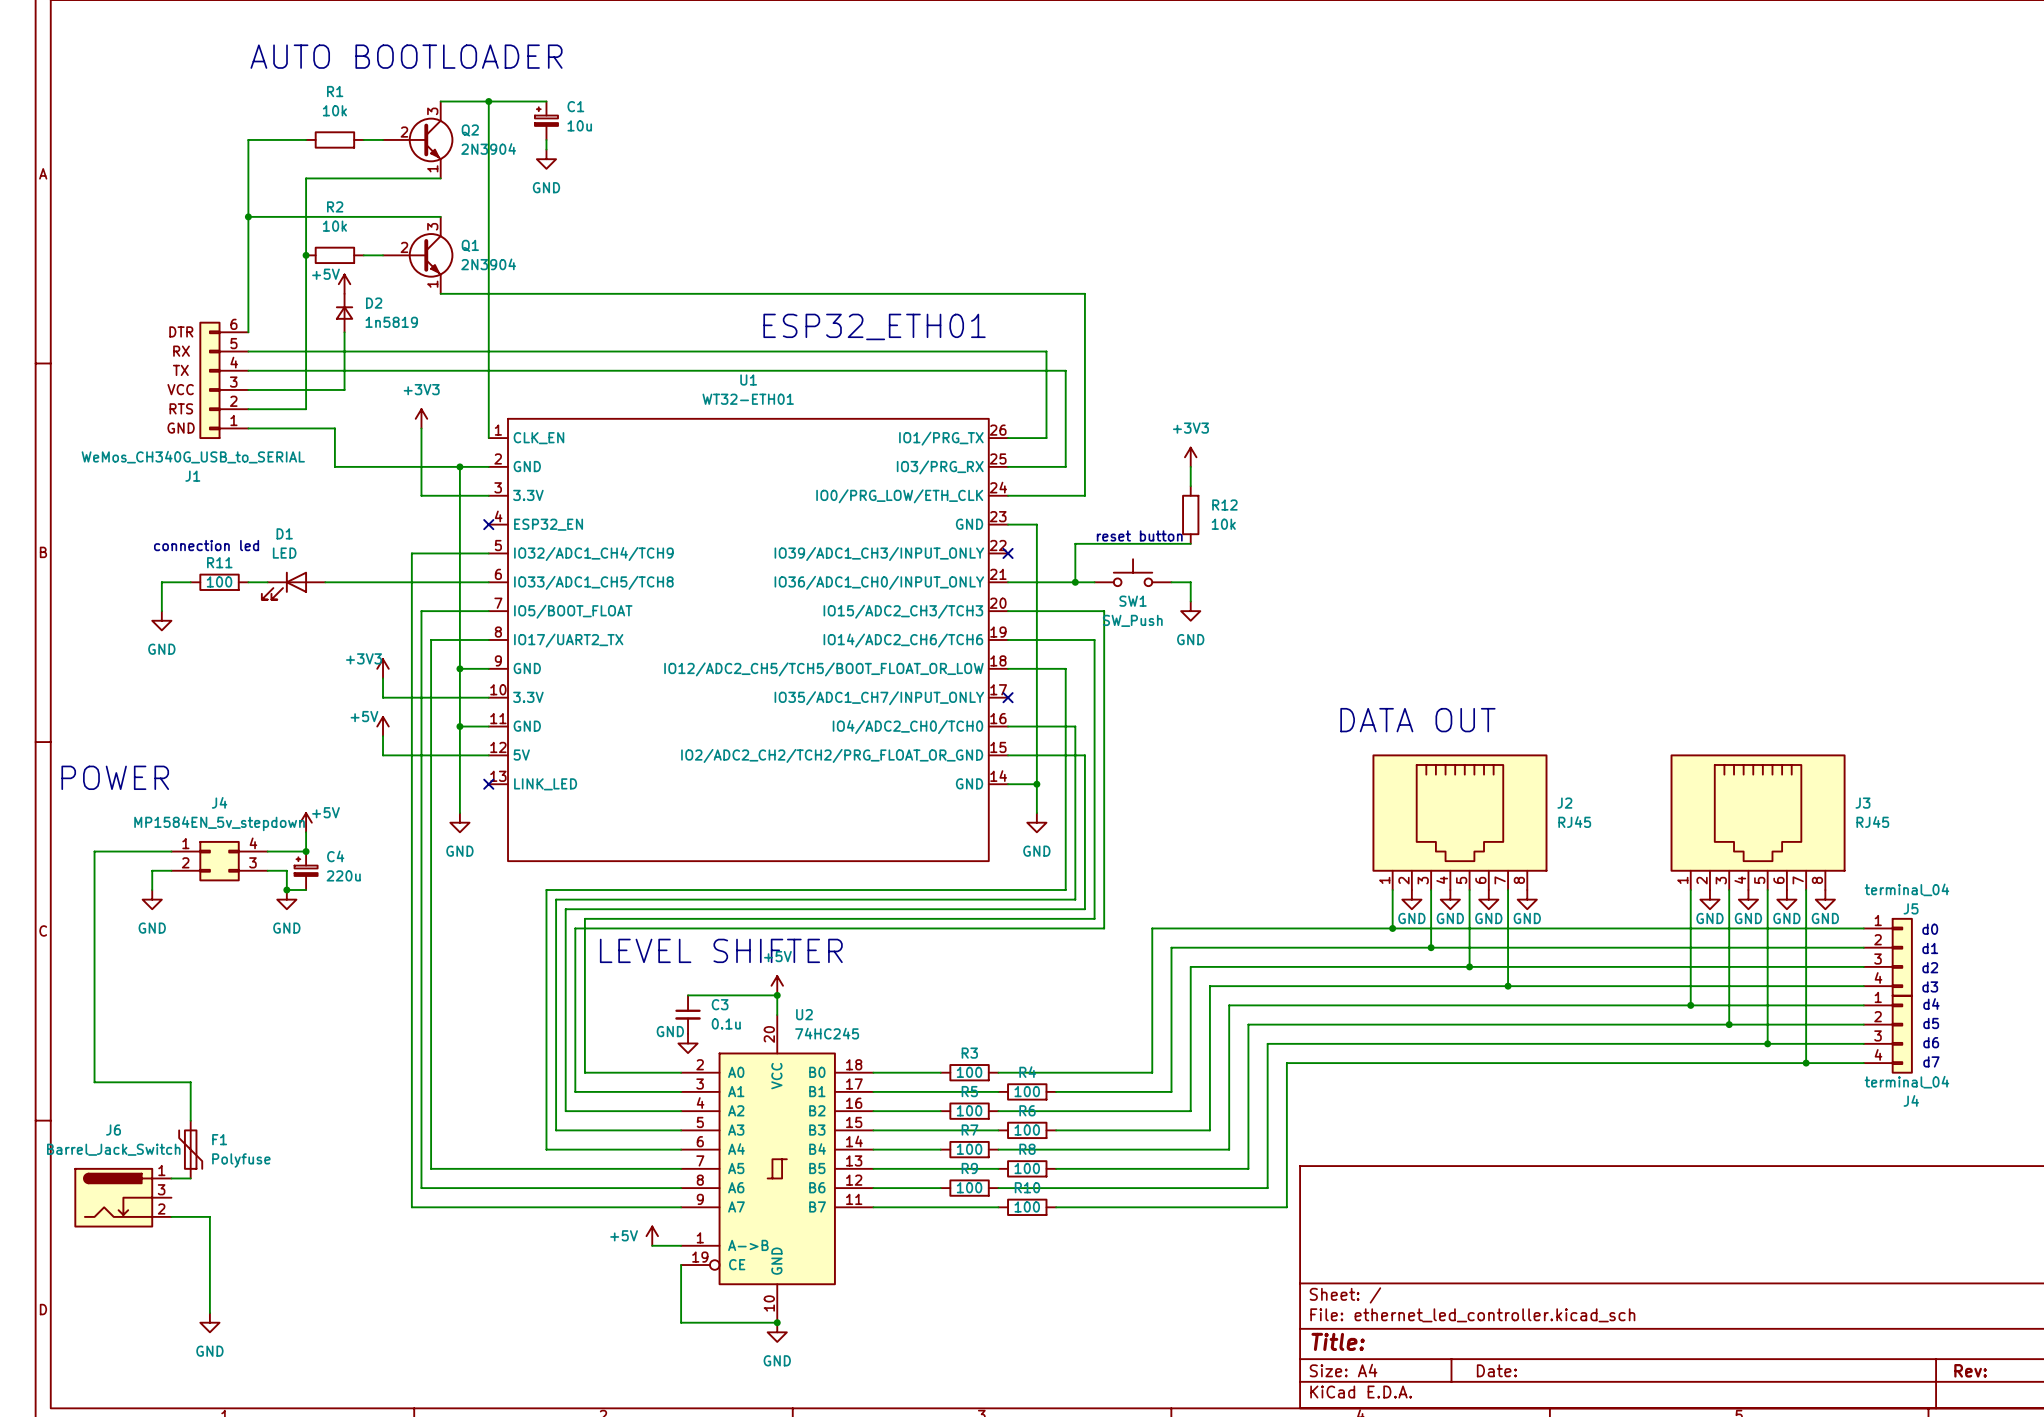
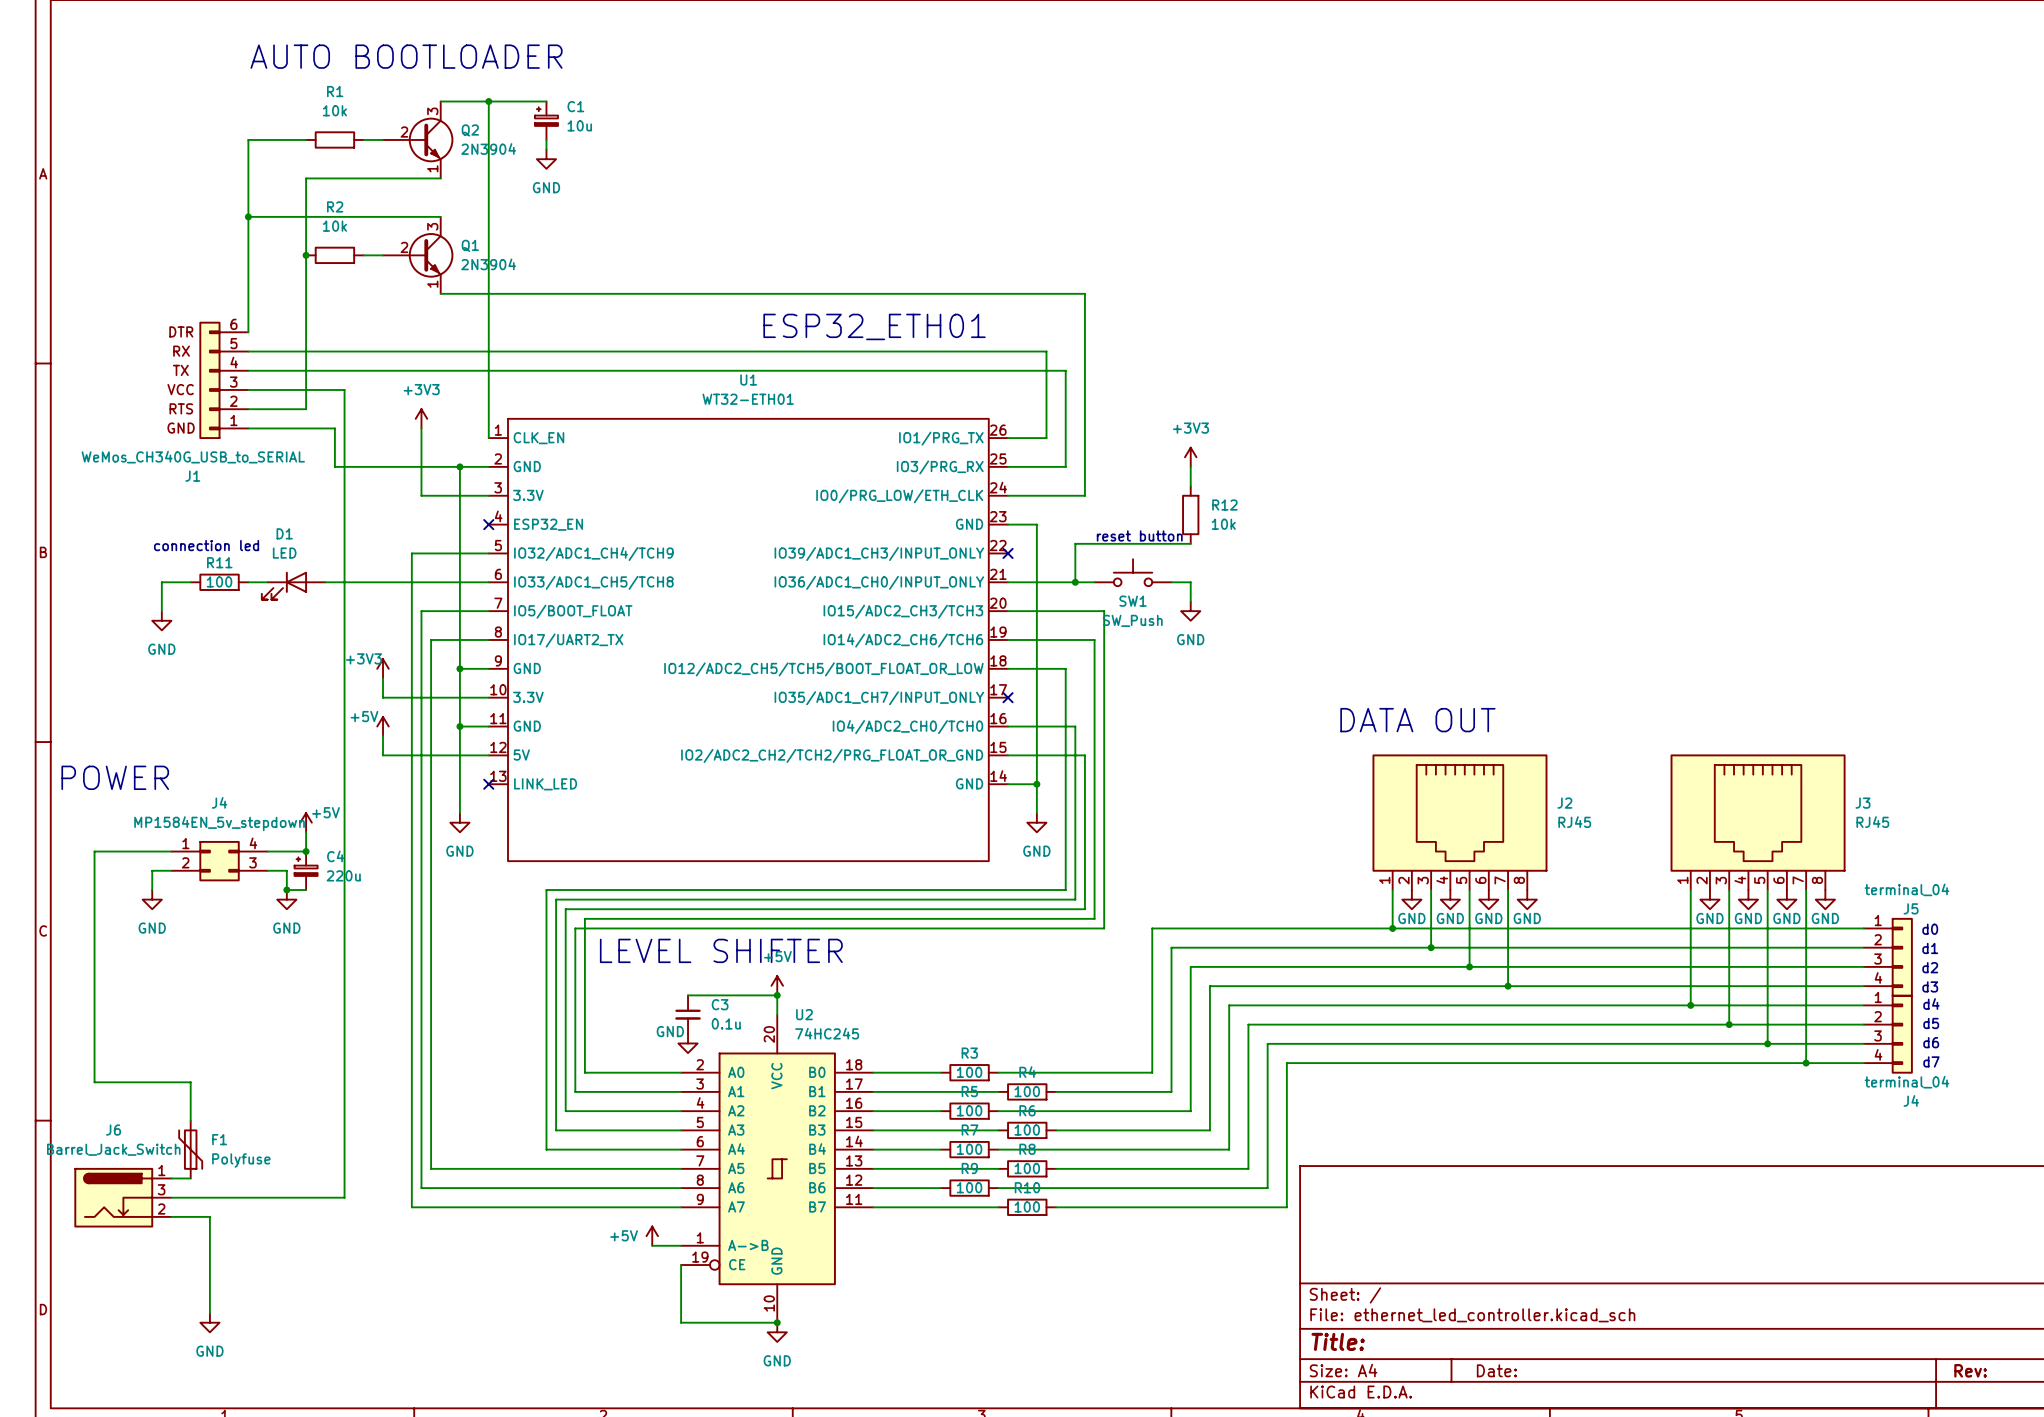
power symbol: +5V (344, 284) -> none
D2: 1n5819 (344, 313) -> none
wire: (344, 332) (344, 389) -> (171, 1197) (344, 1197) (344, 389)

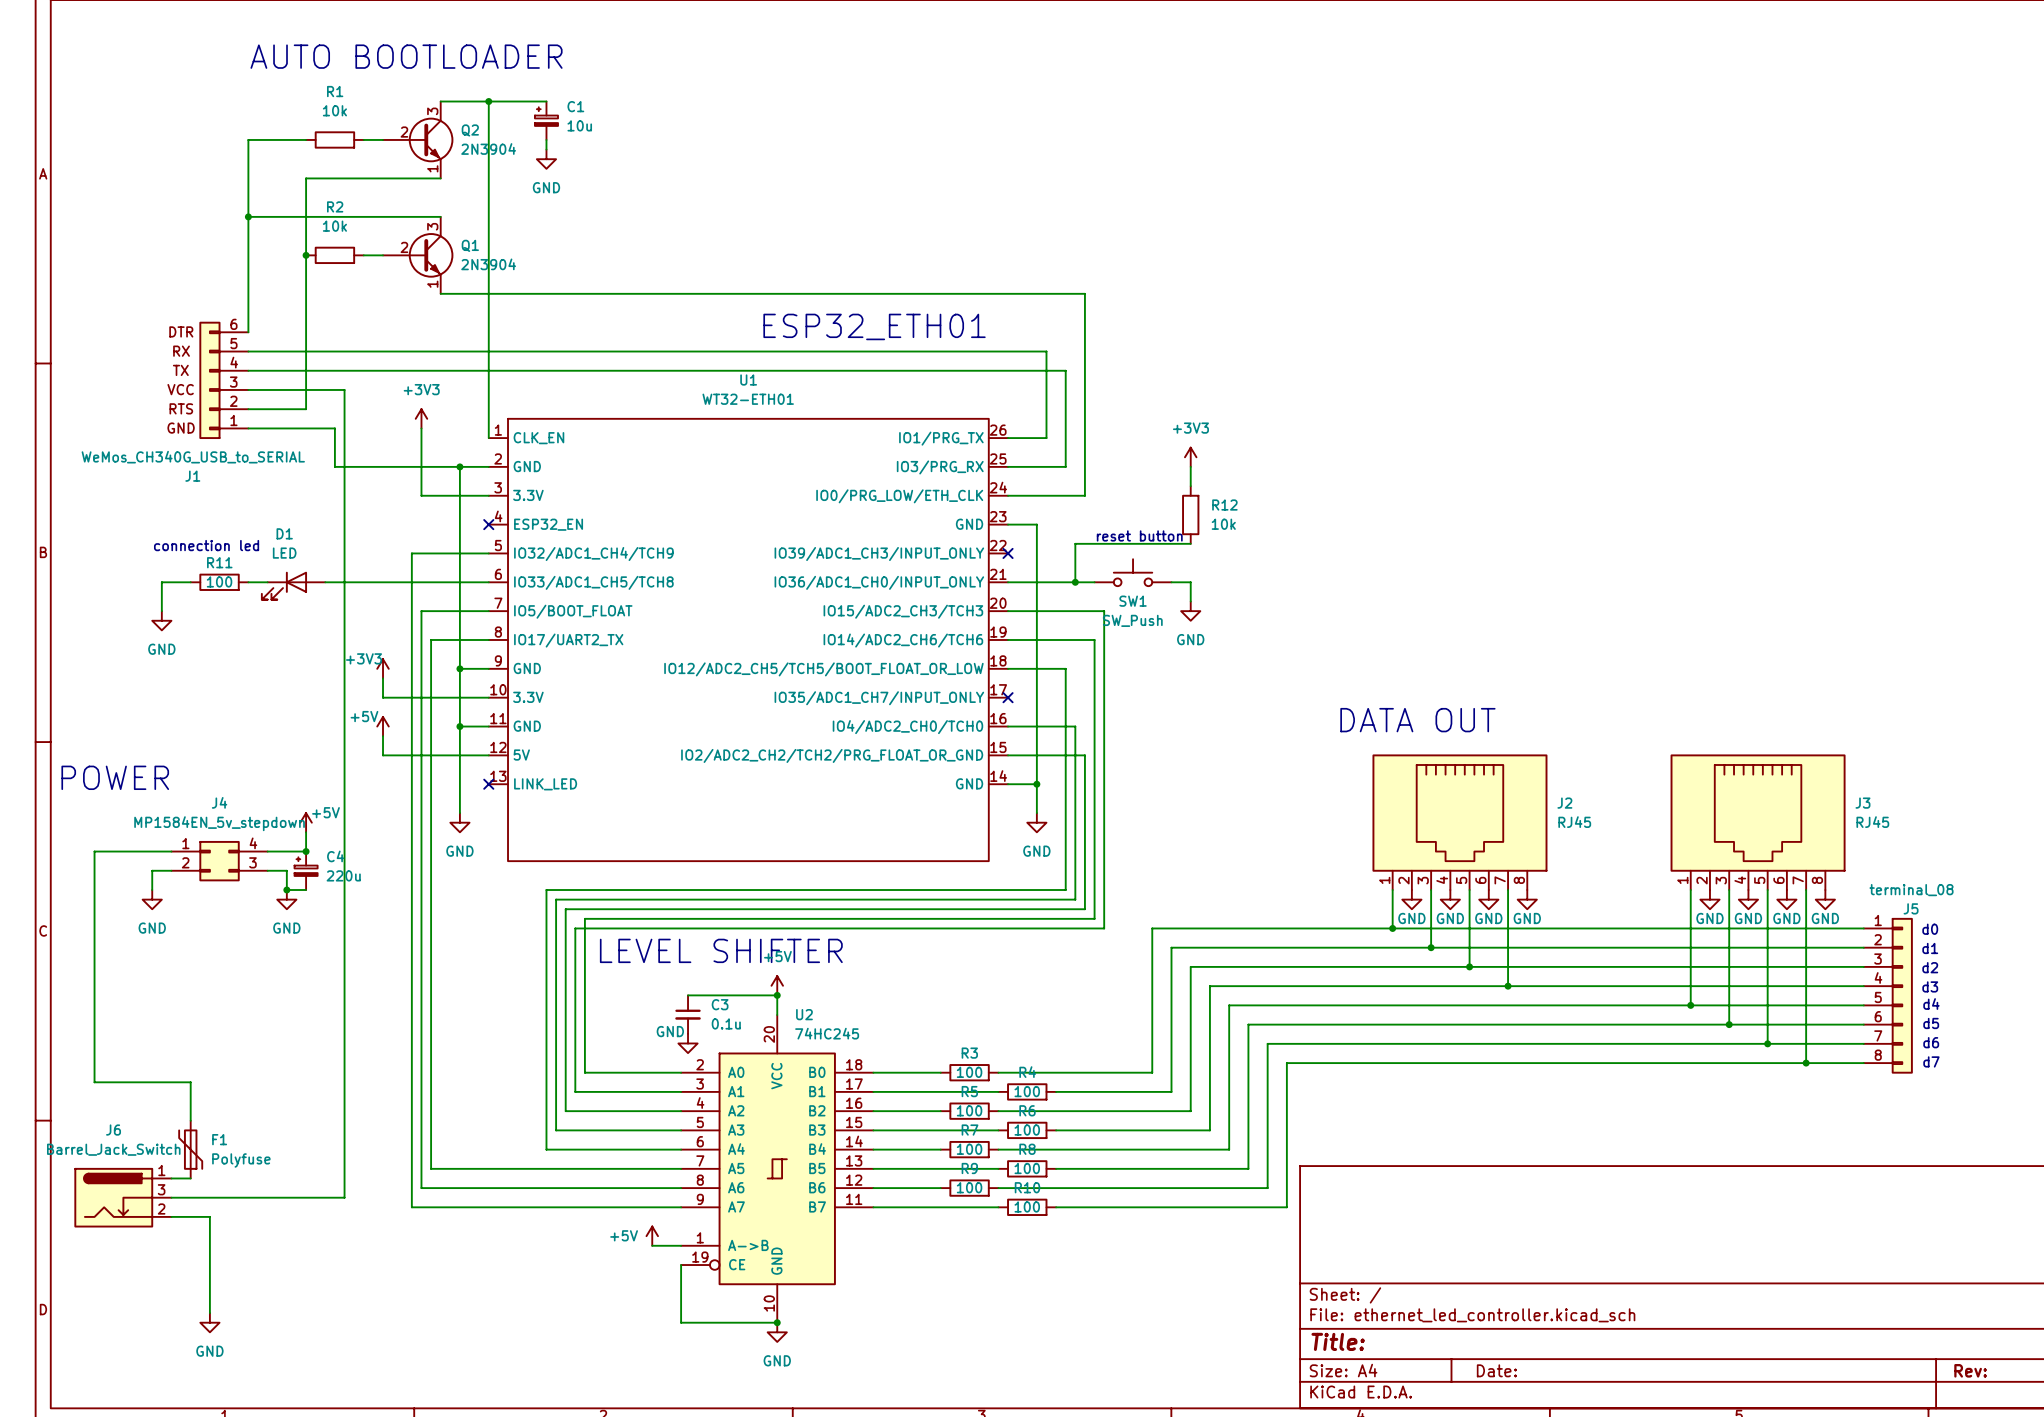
J5 value: terminal_04 (1906, 889) -> terminal_08 (1911, 890)
J5 symbol: [1863, 917, 1913, 997] -> [1863, 917, 1913, 1074]
J4: terminal_04 (1888, 1034) -> none

